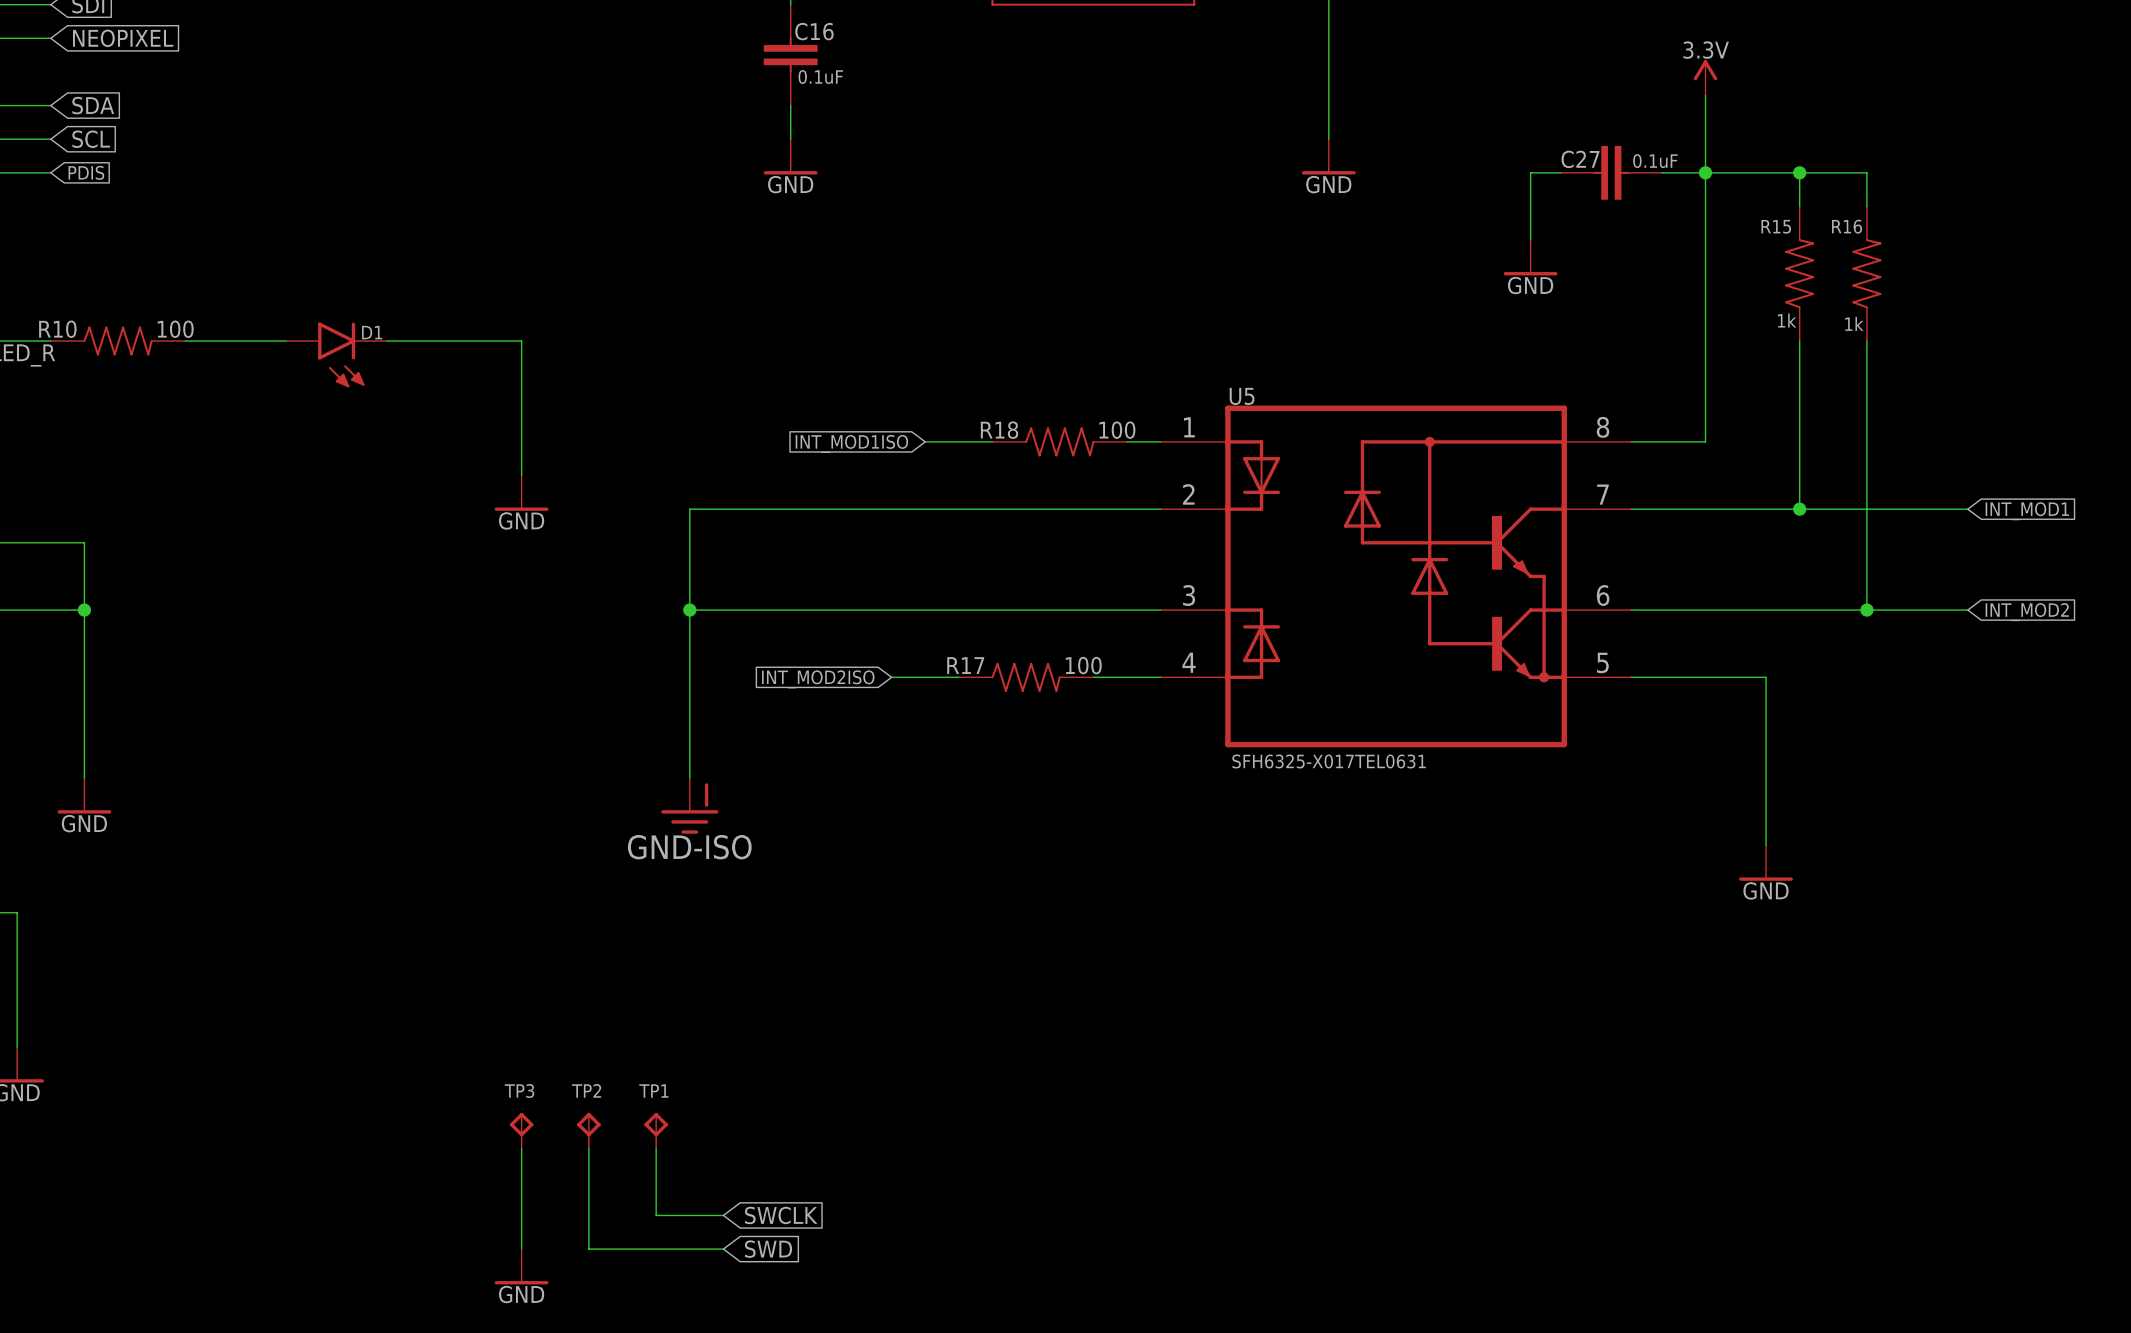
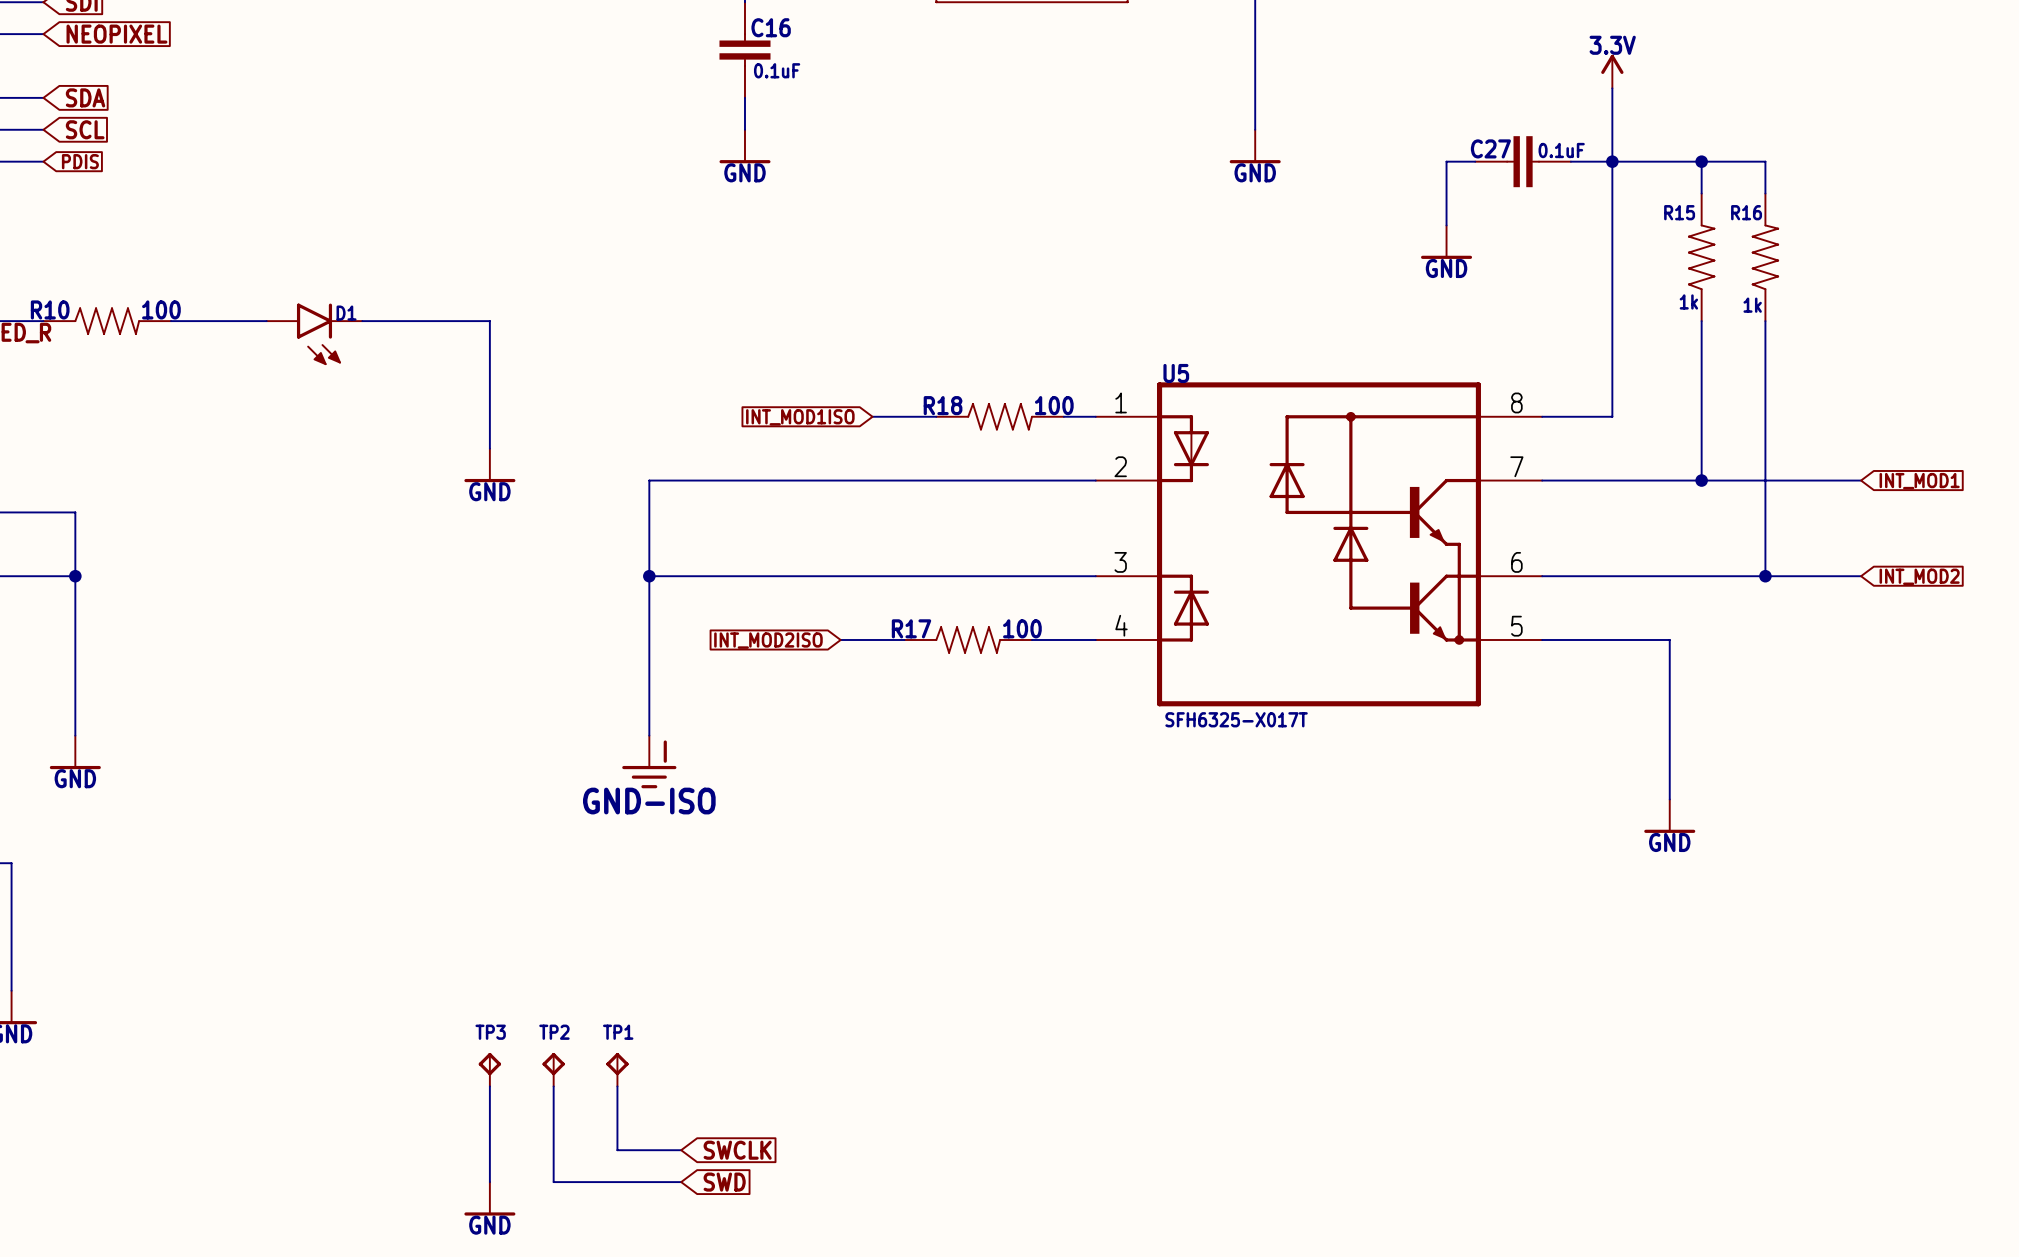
U5 value: SFH6325-X017TEL0631 (1329, 761) -> SFH6325-X017T (1236, 719)

